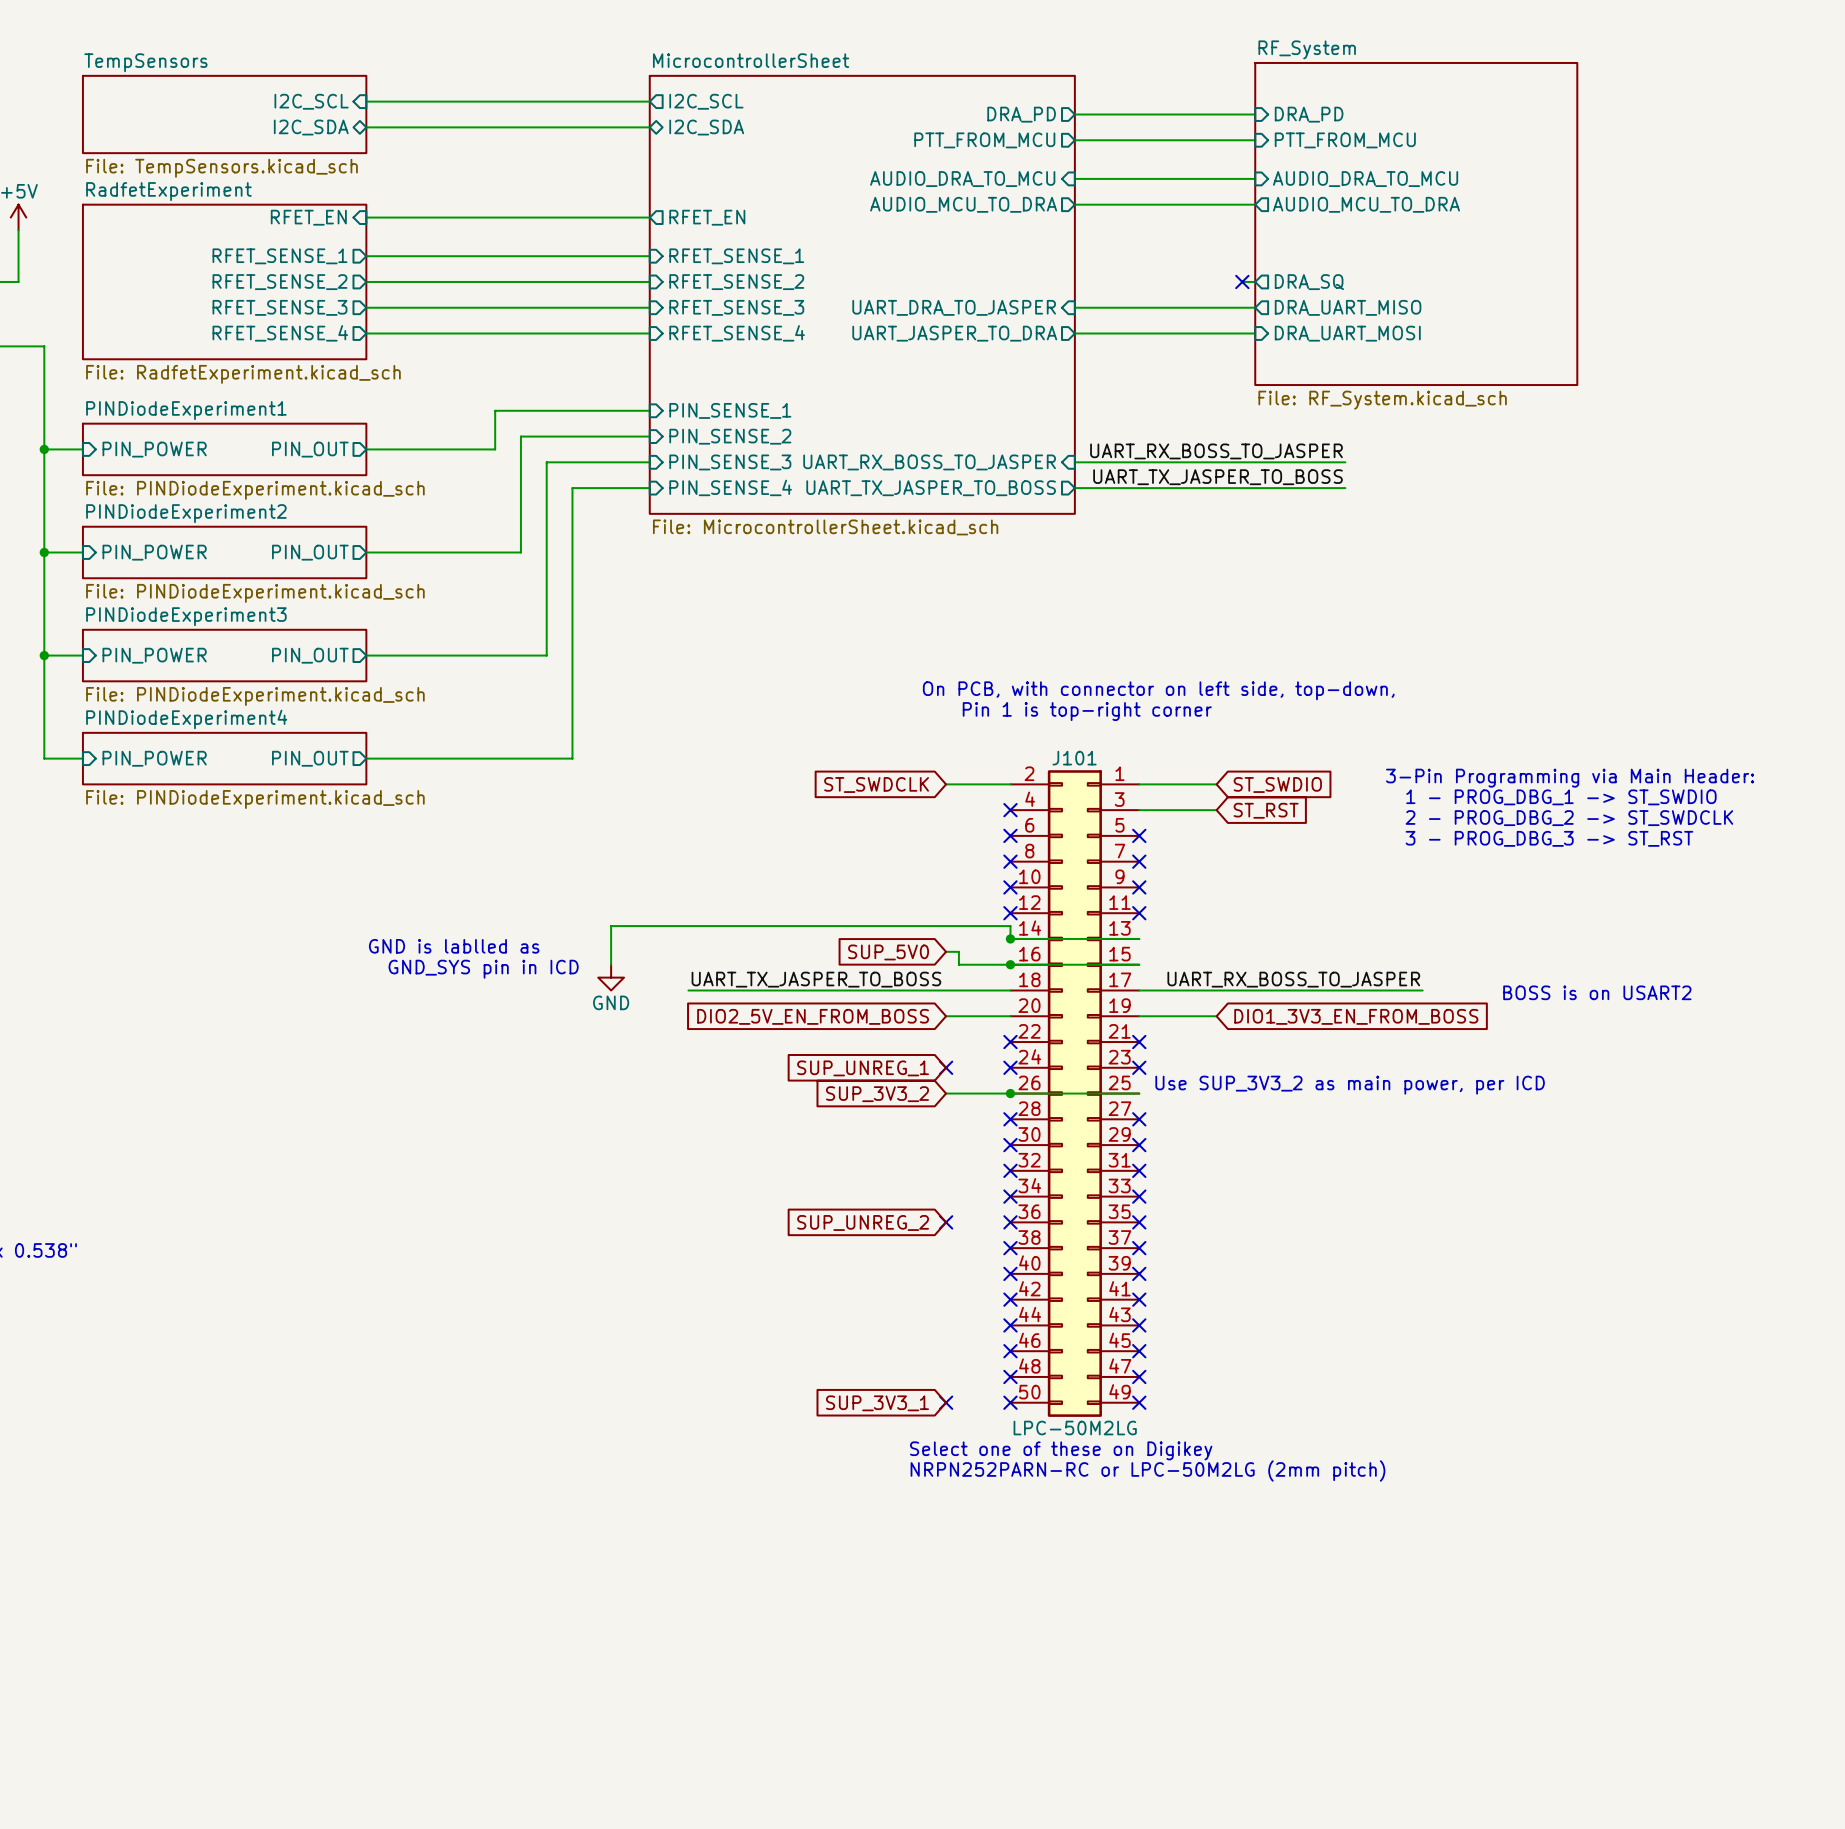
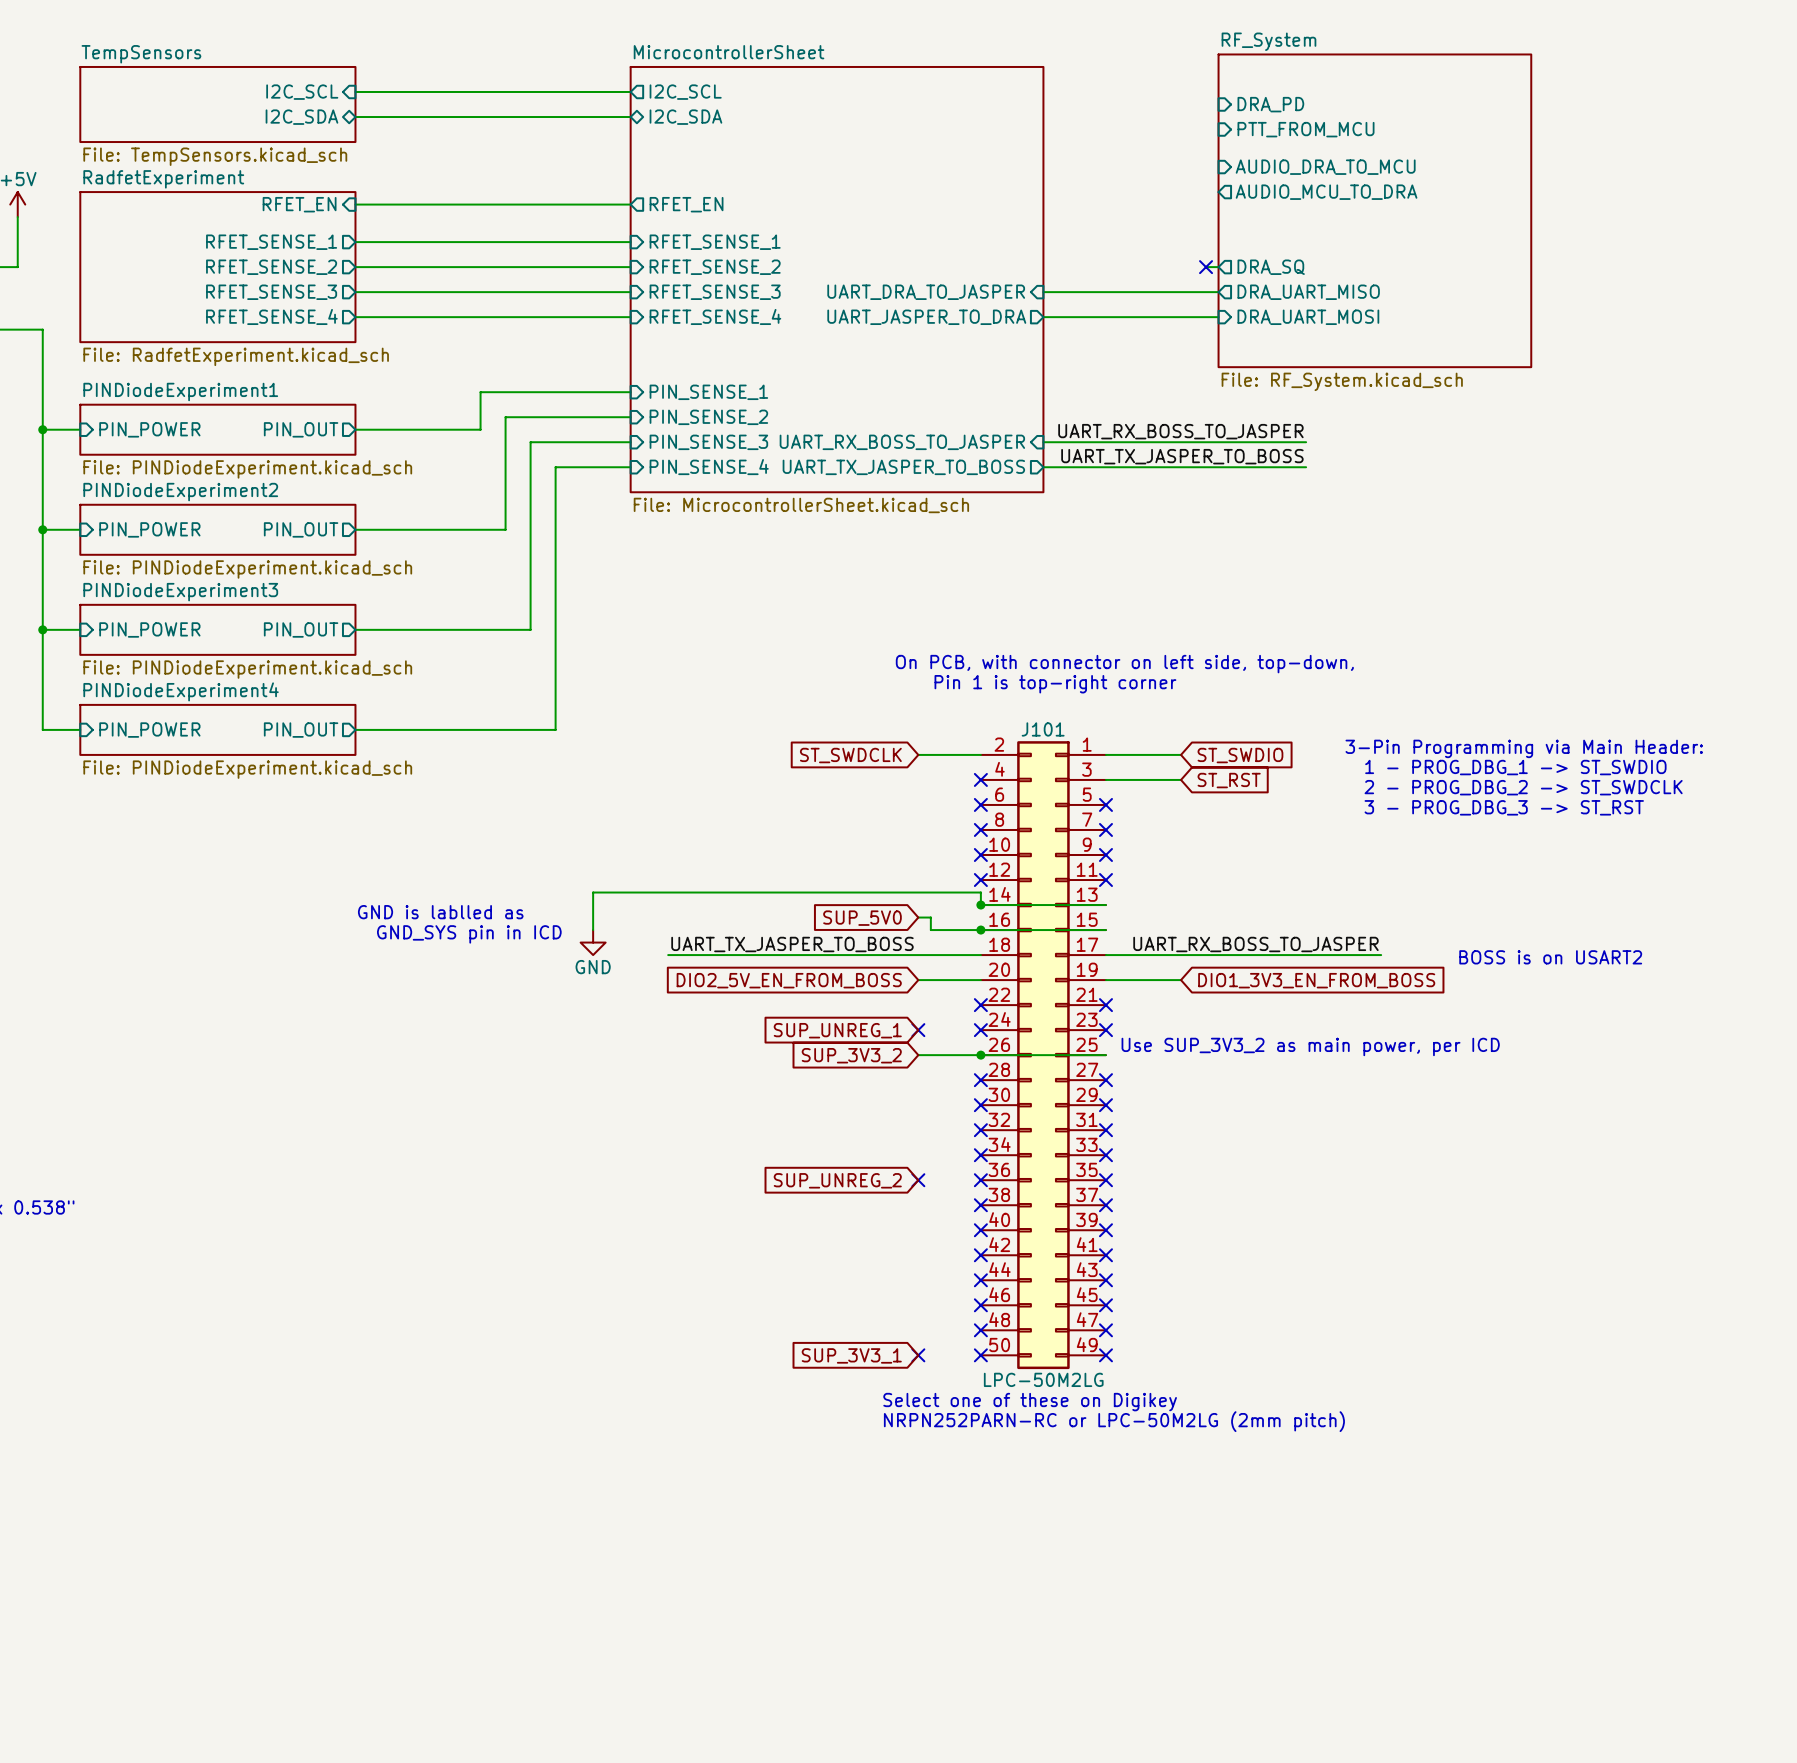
sheet pin: DRA_PD (1021, 114) -> none
wire: (1074, 114) (1255, 114) -> none
sheet pin: PTT_FROM_MCU (984, 140) -> none
wire: (1074, 140) (1255, 140) -> none
wire: (1074, 178) (1255, 178) -> none
sheet pin: AUDIO_DRA_TO_MCU (962, 179) -> none
sheet pin: AUDIO_MCU_TO_DRA (963, 204) -> none
wire: (1074, 204) (1255, 204) -> none

